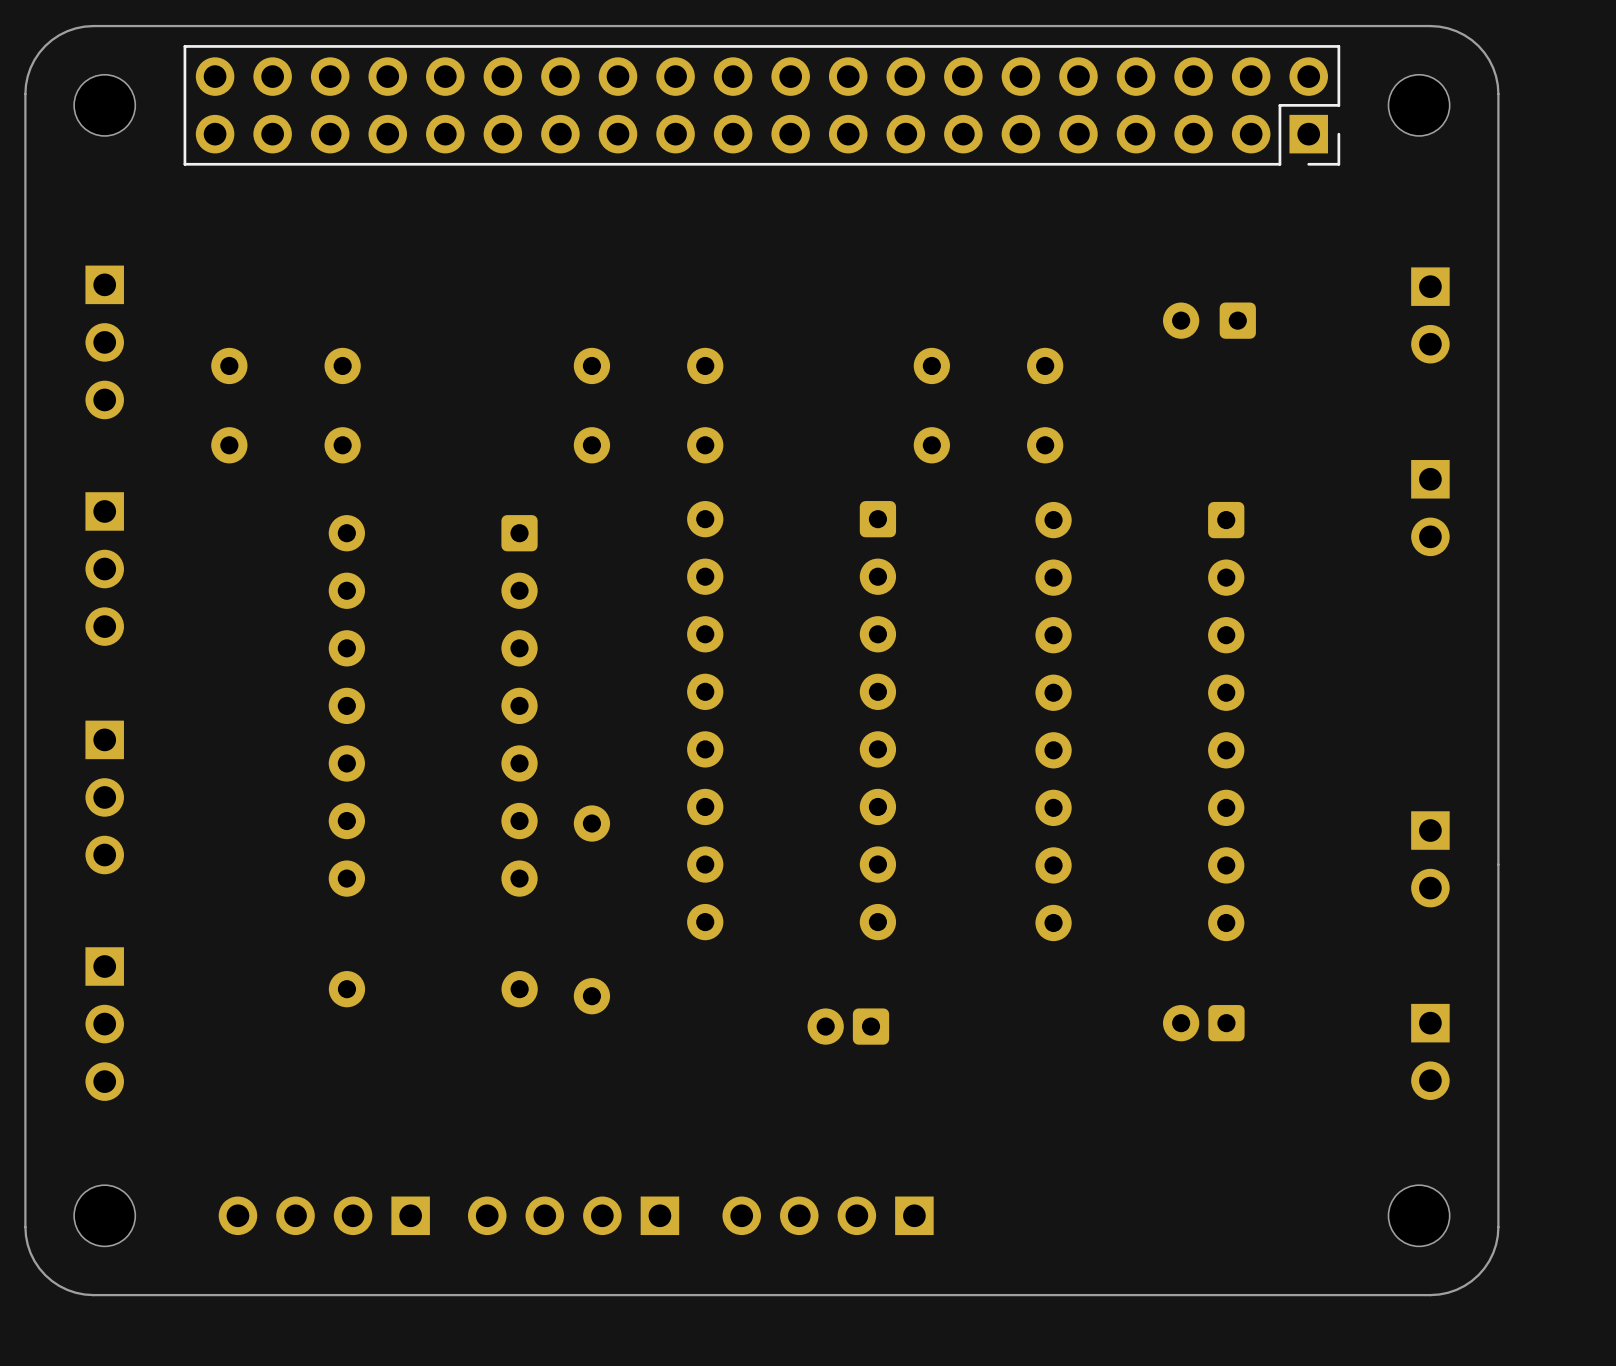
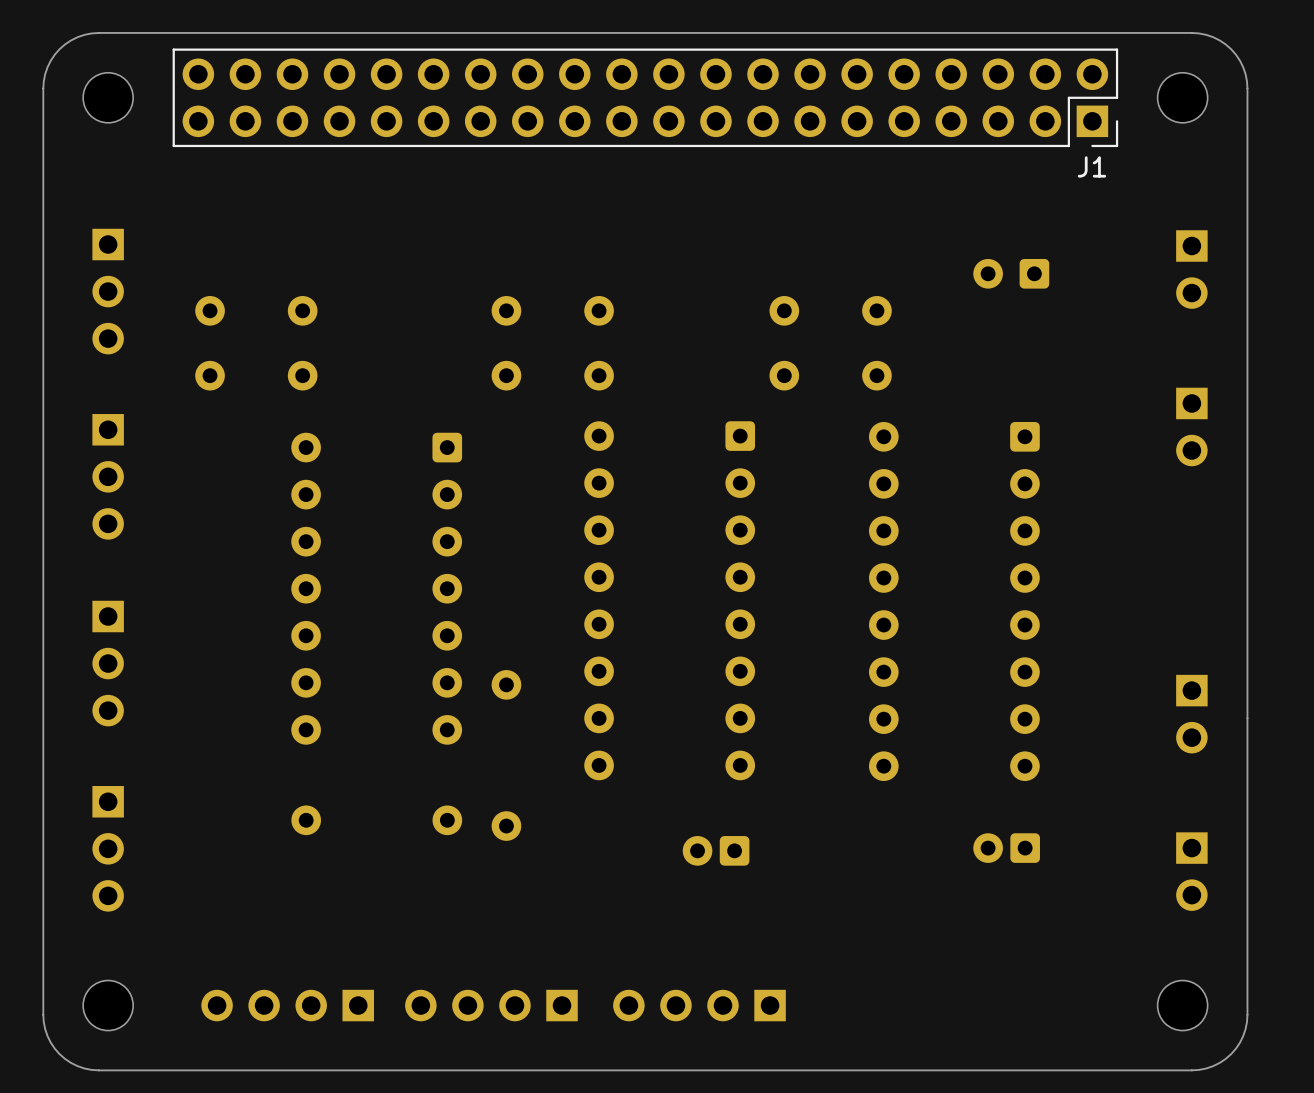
J1 name: none -> J1 (1091, 166)

